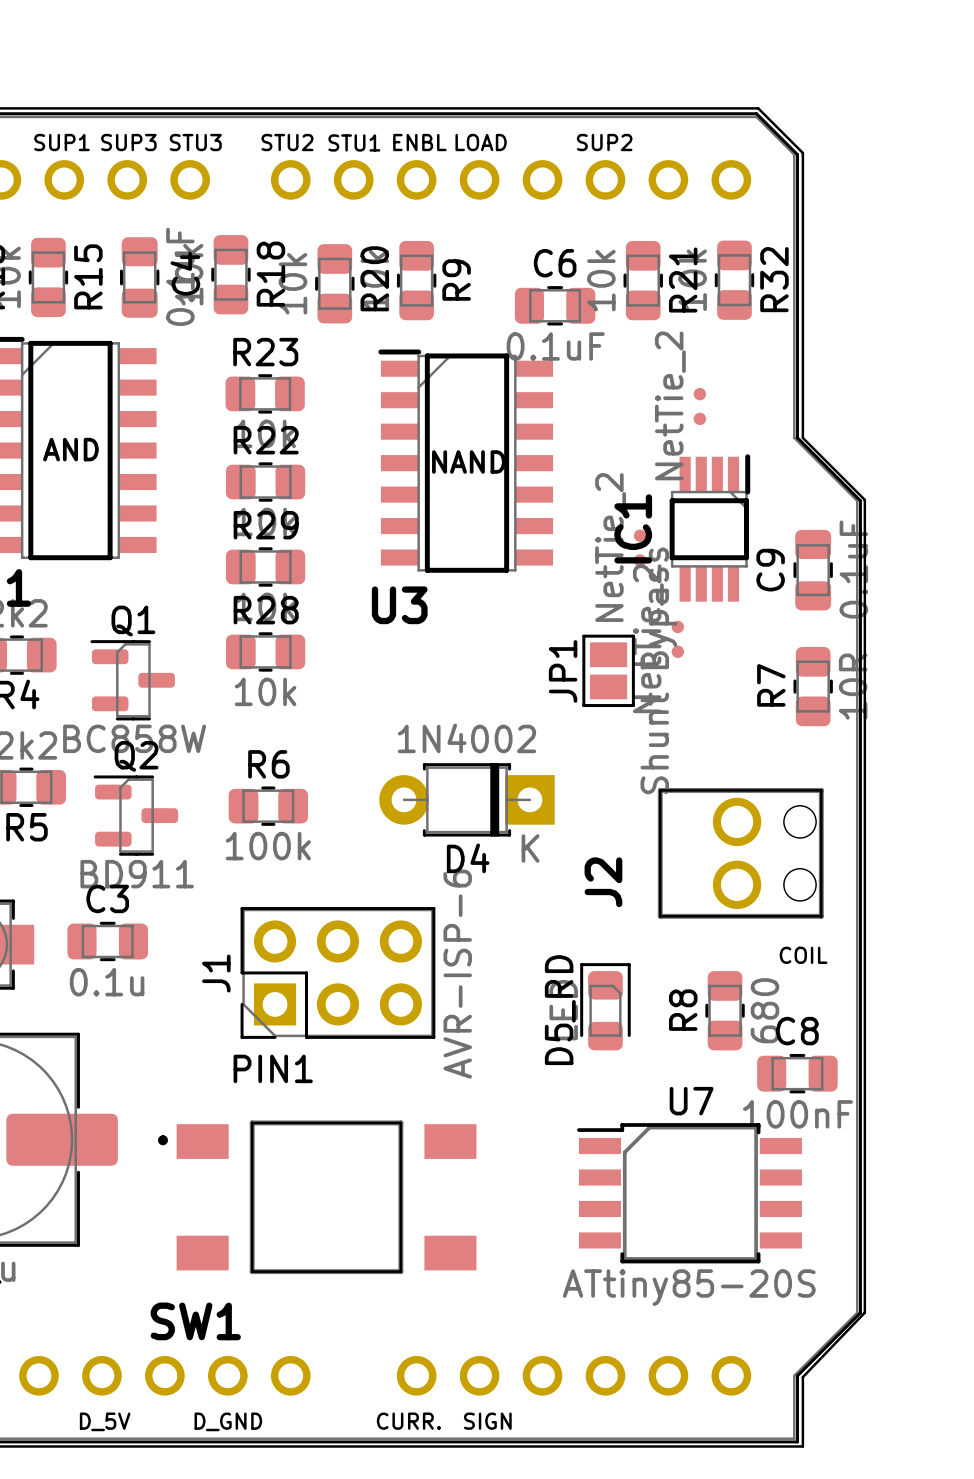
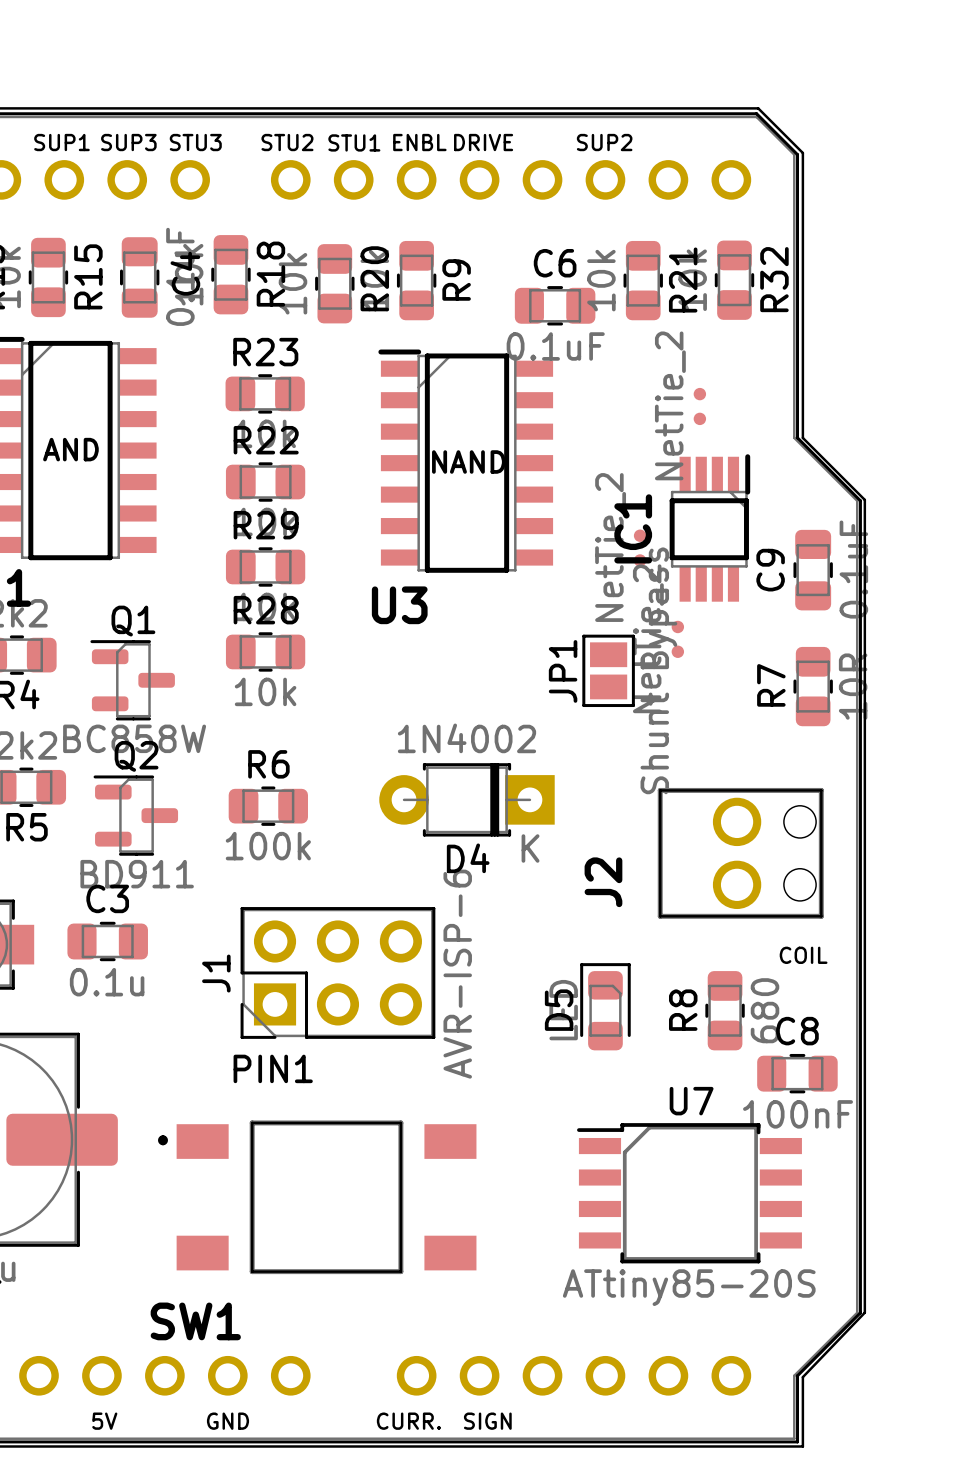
text: LOAD (481, 142) -> DRIVE (483, 142)
D5_RD name: D5_RD (560, 1010) -> D5 (559, 1010)
text: D_5V (105, 1421) -> 5V (104, 1421)
text: D_GND (228, 1421) -> GND (227, 1421)

